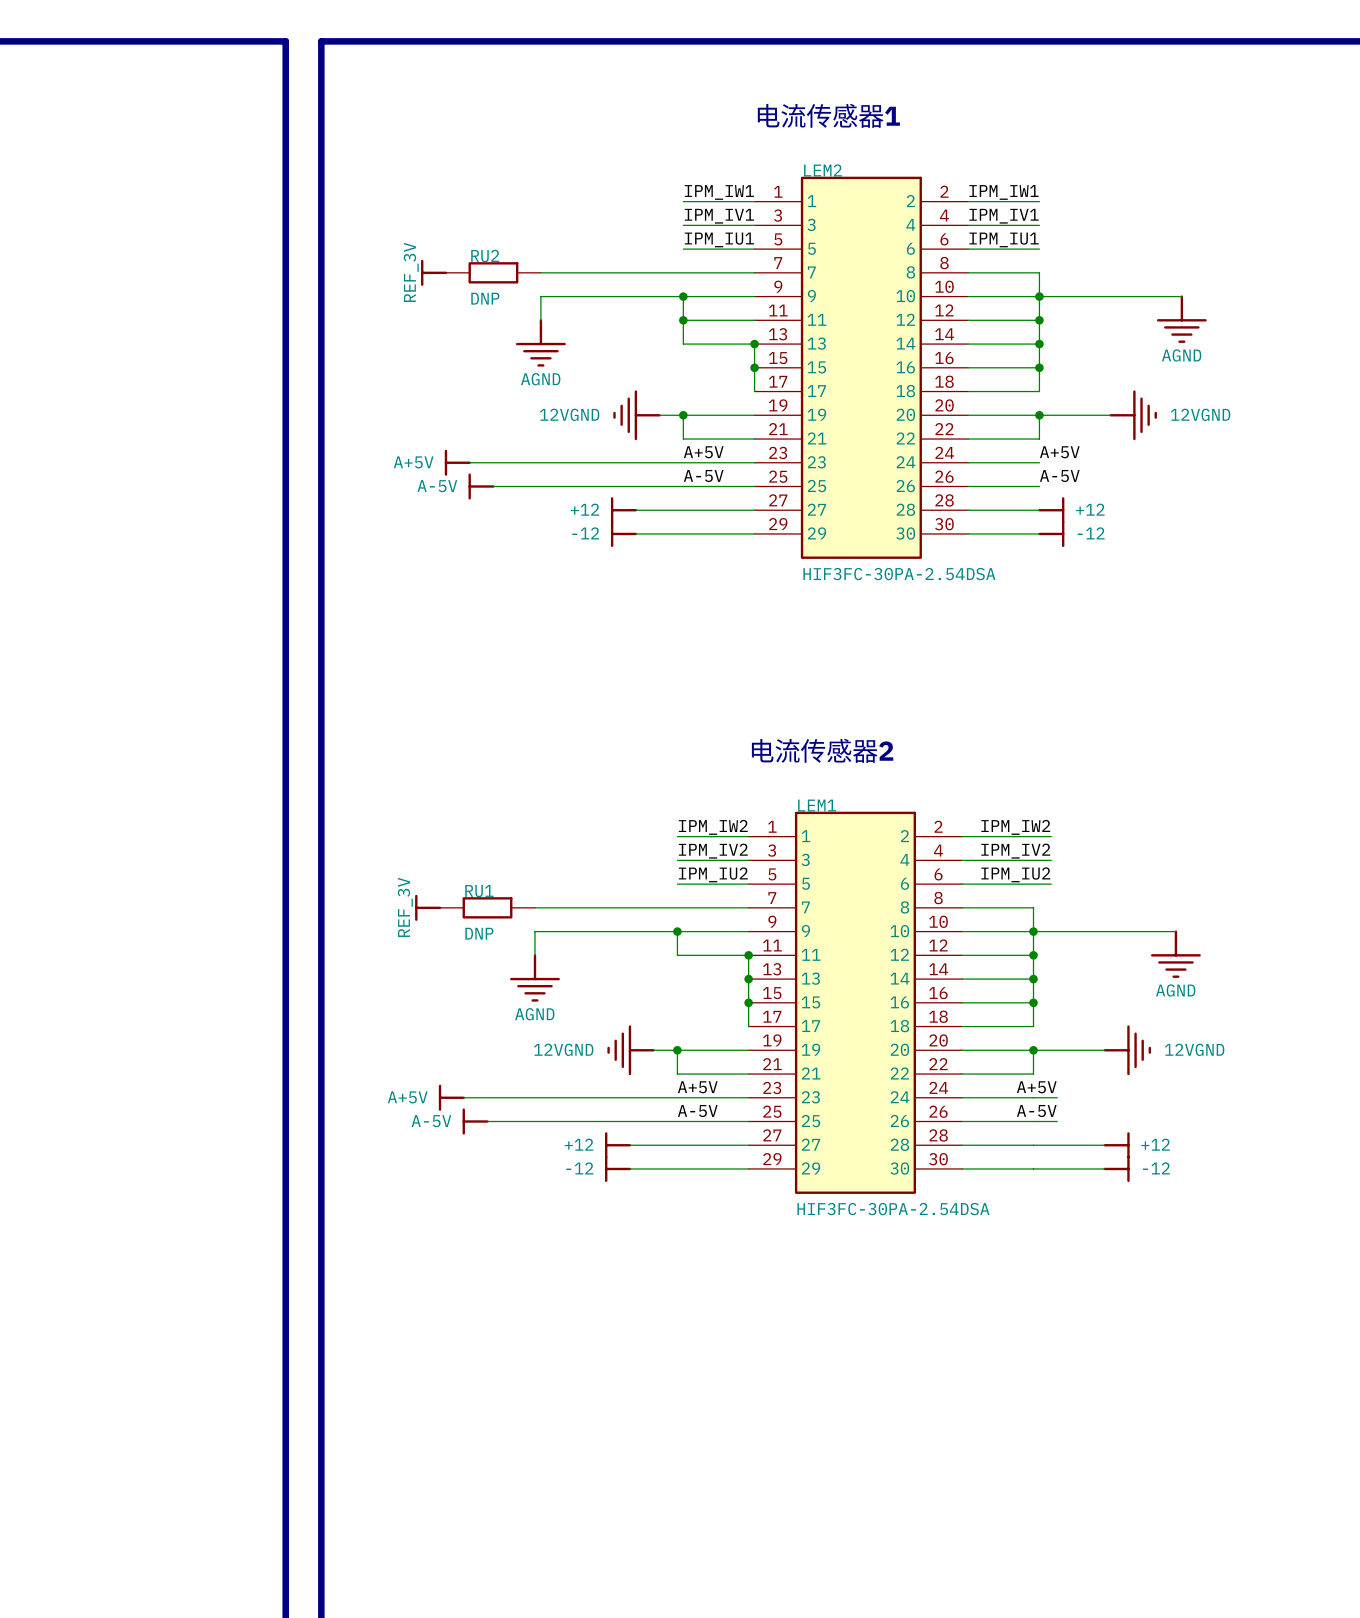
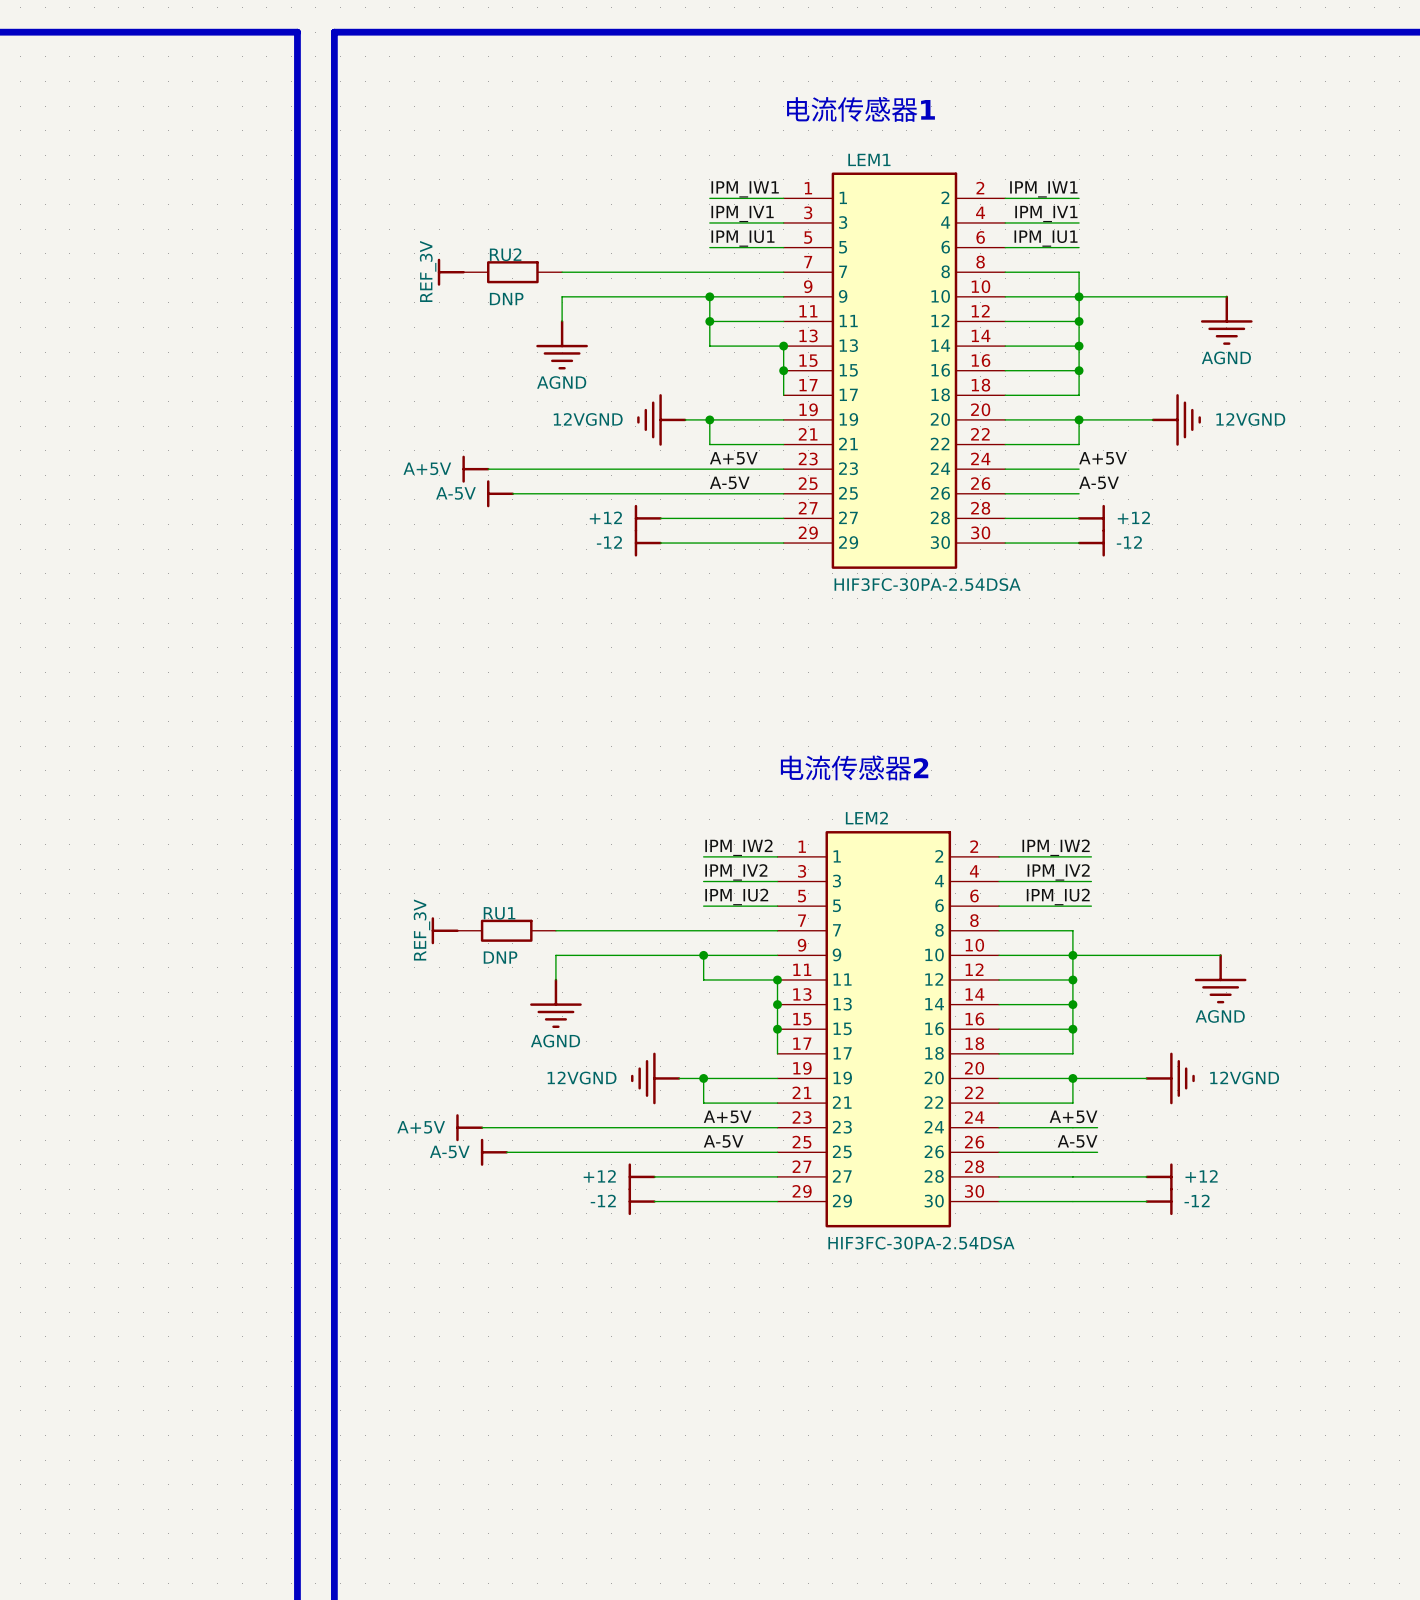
LEM2 name: LEM2 (822, 170) -> LEM1 (869, 159)
LEM1 name: LEM1 (817, 805) -> LEM2 (866, 818)

